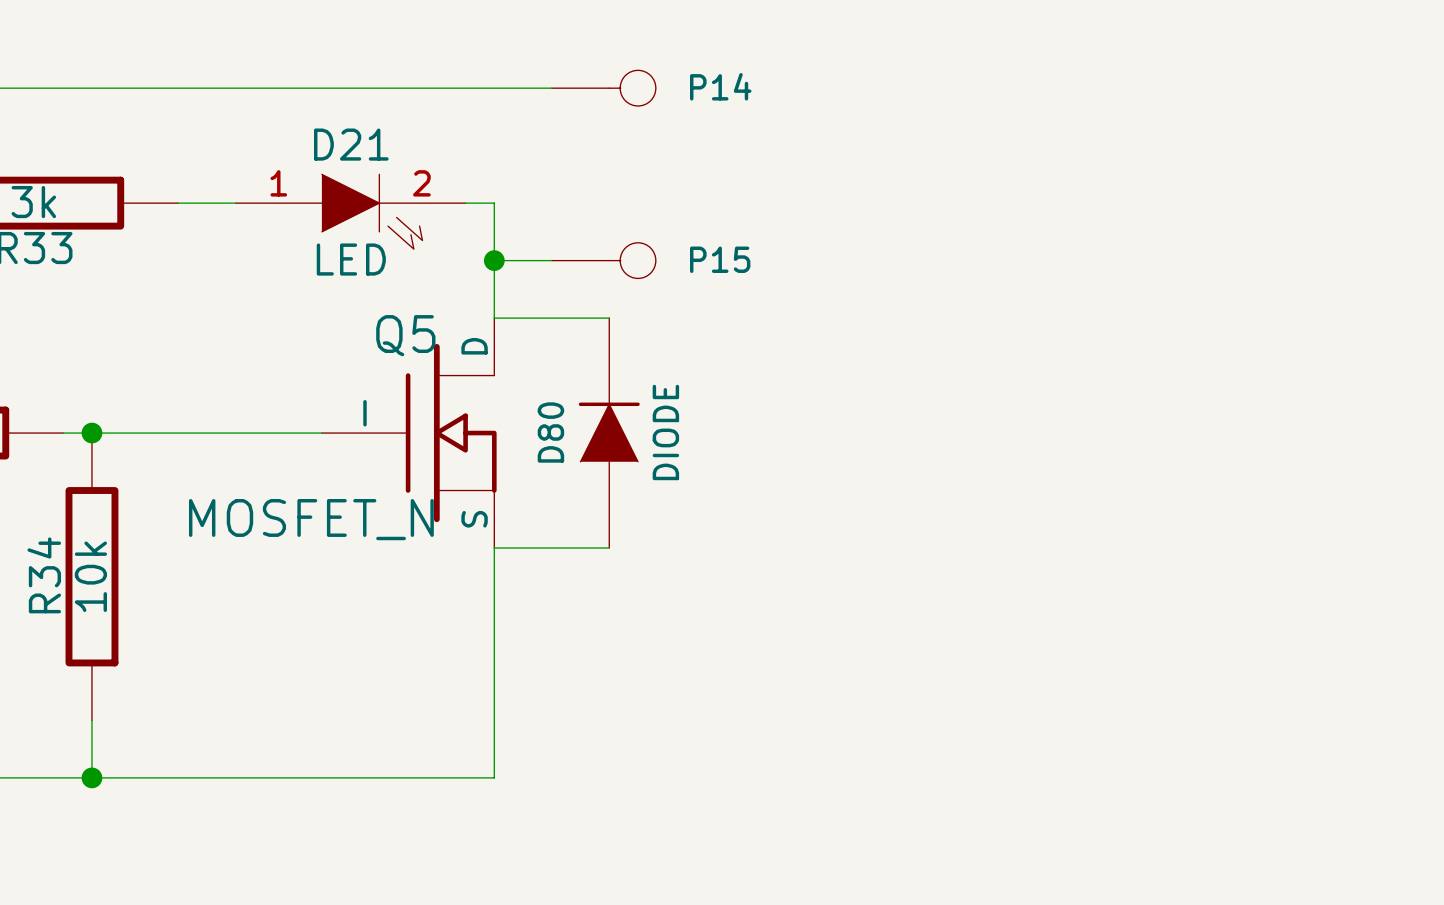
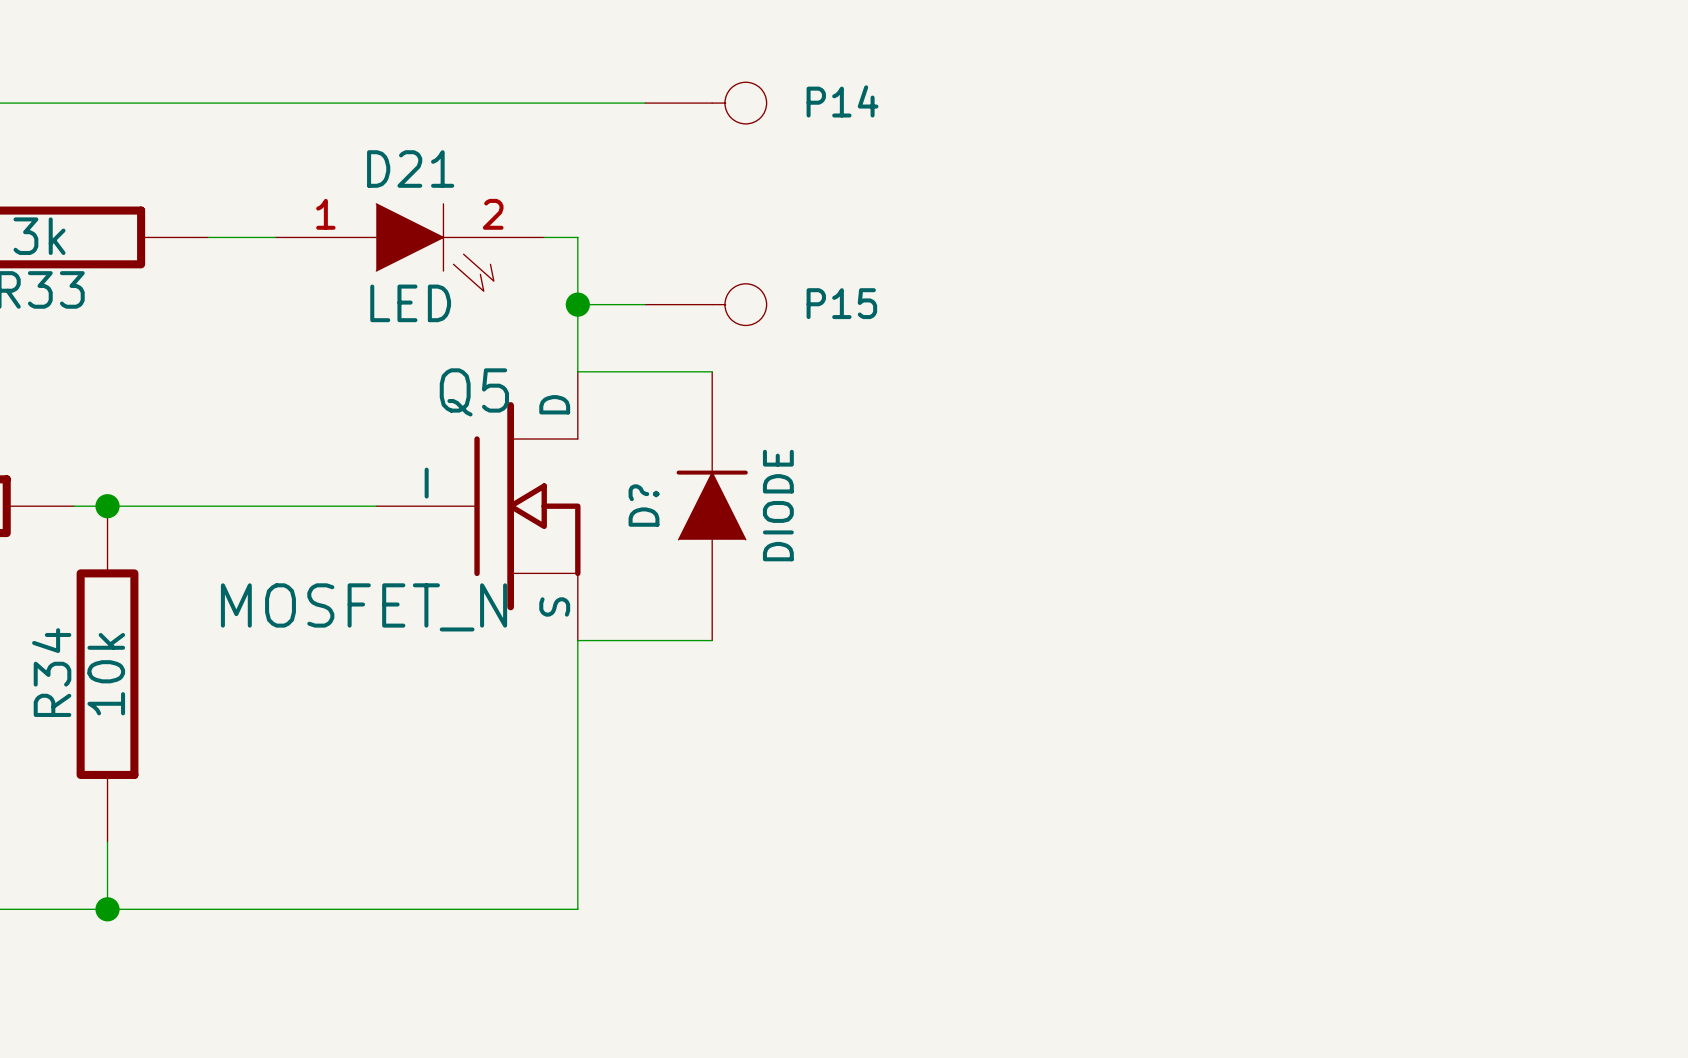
D80 name: D80 (550, 432) -> D? (644, 505)

